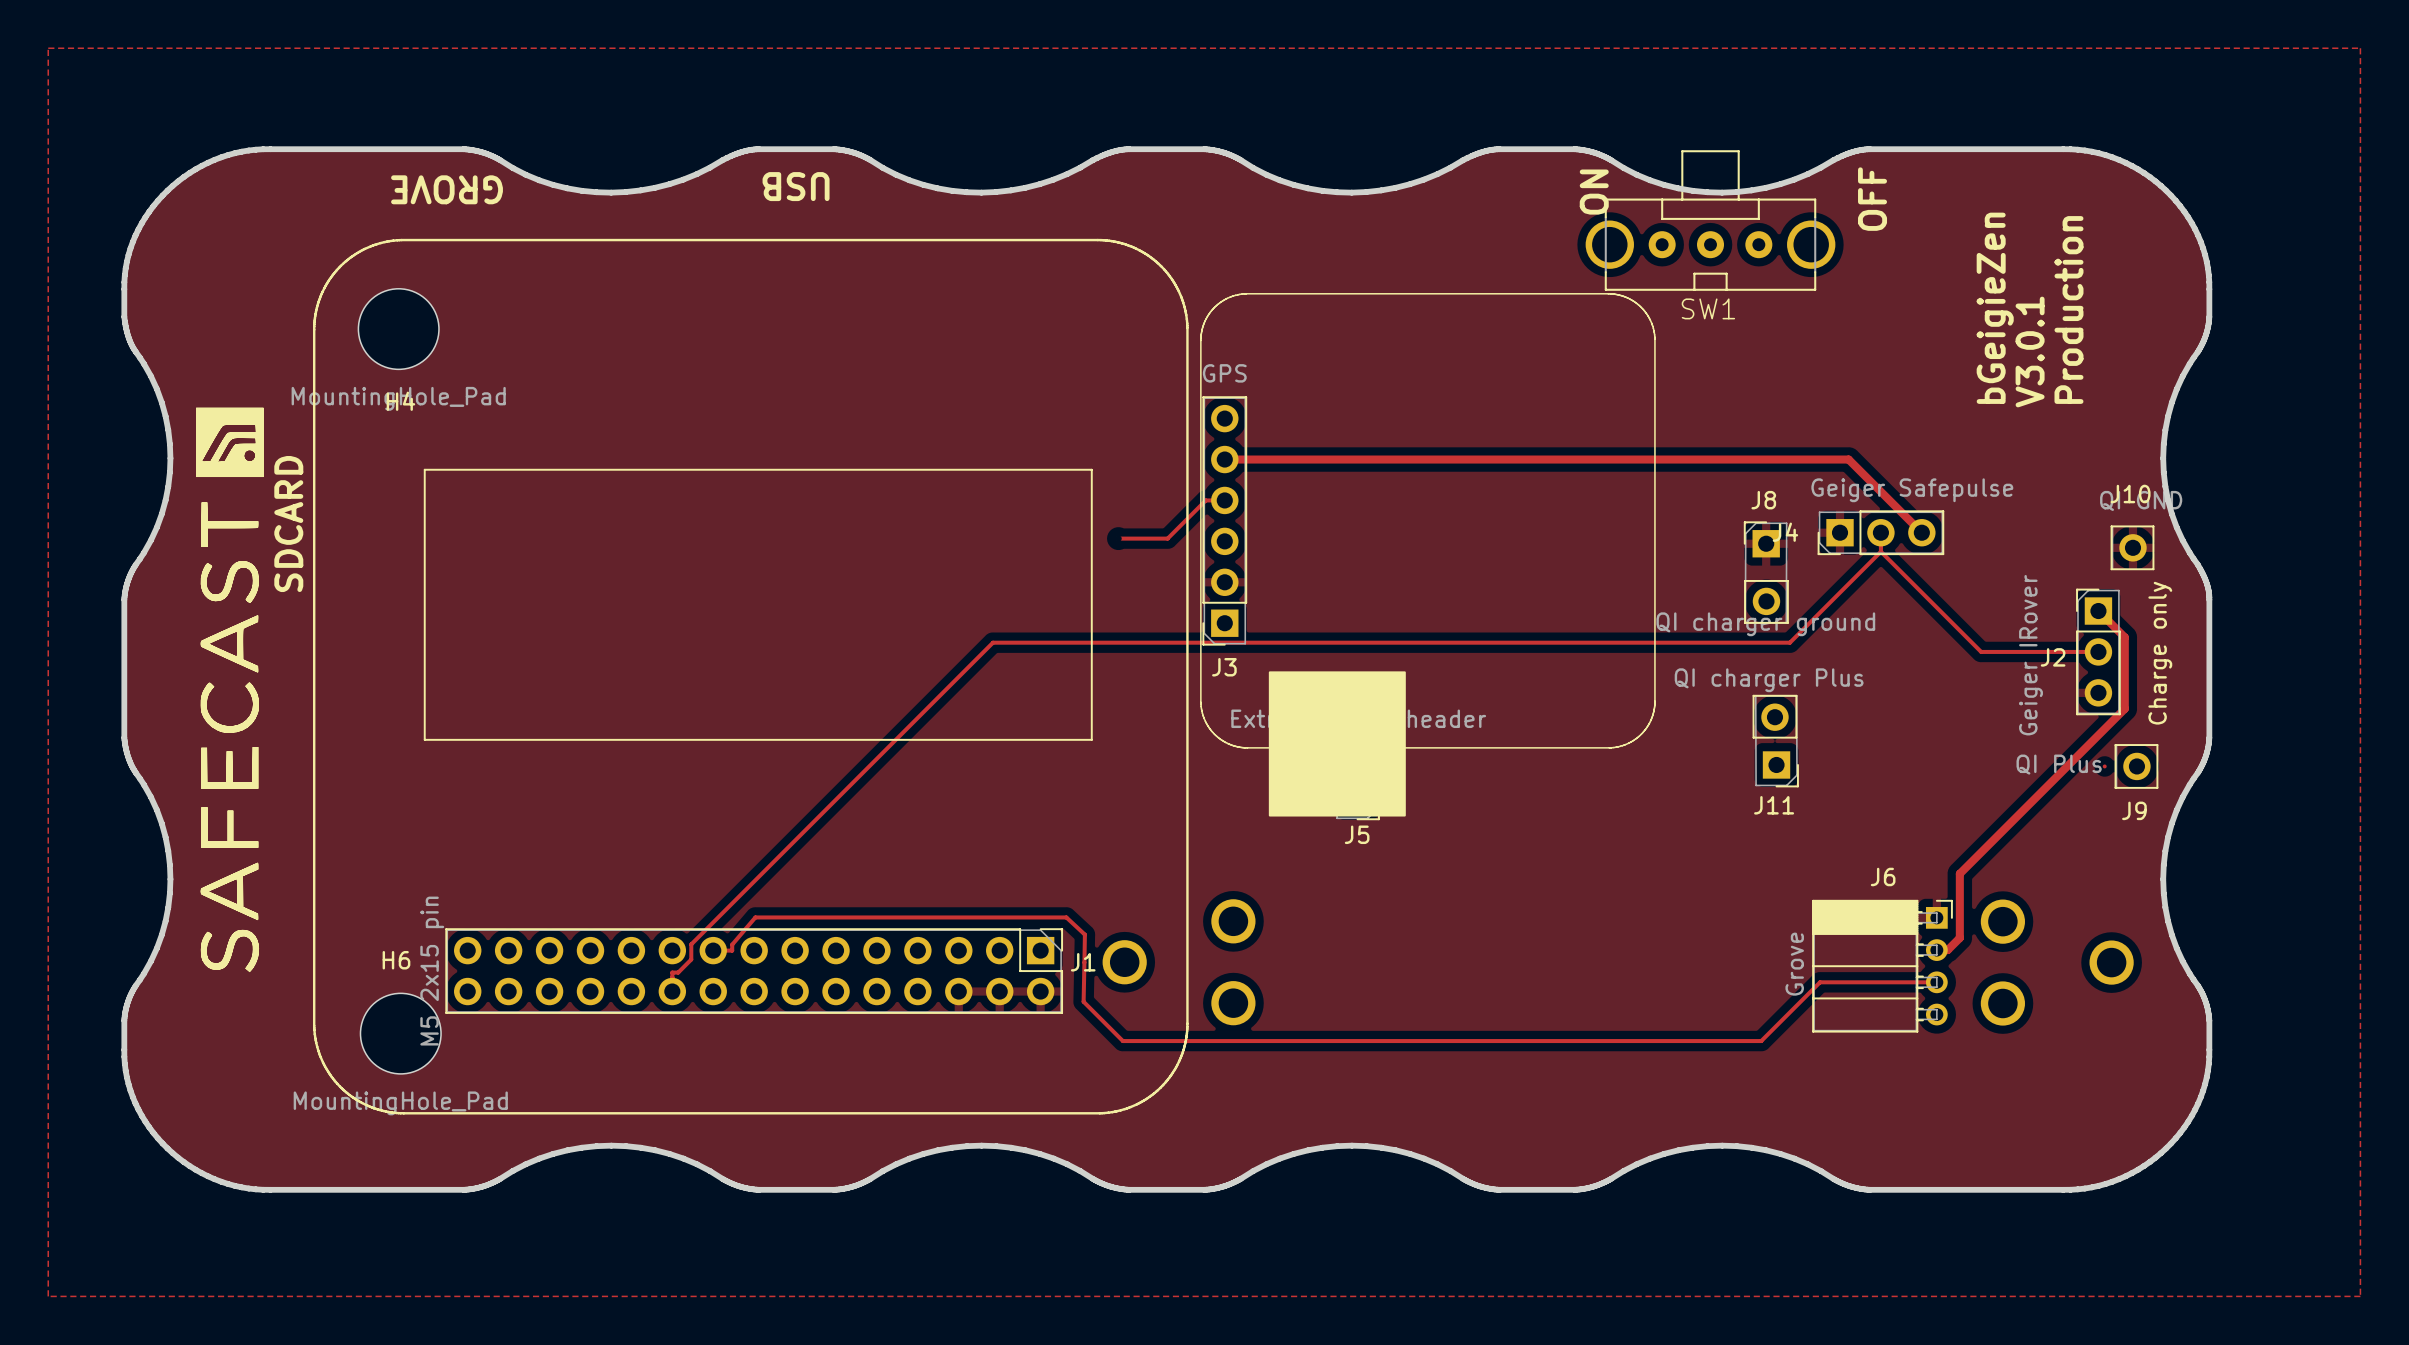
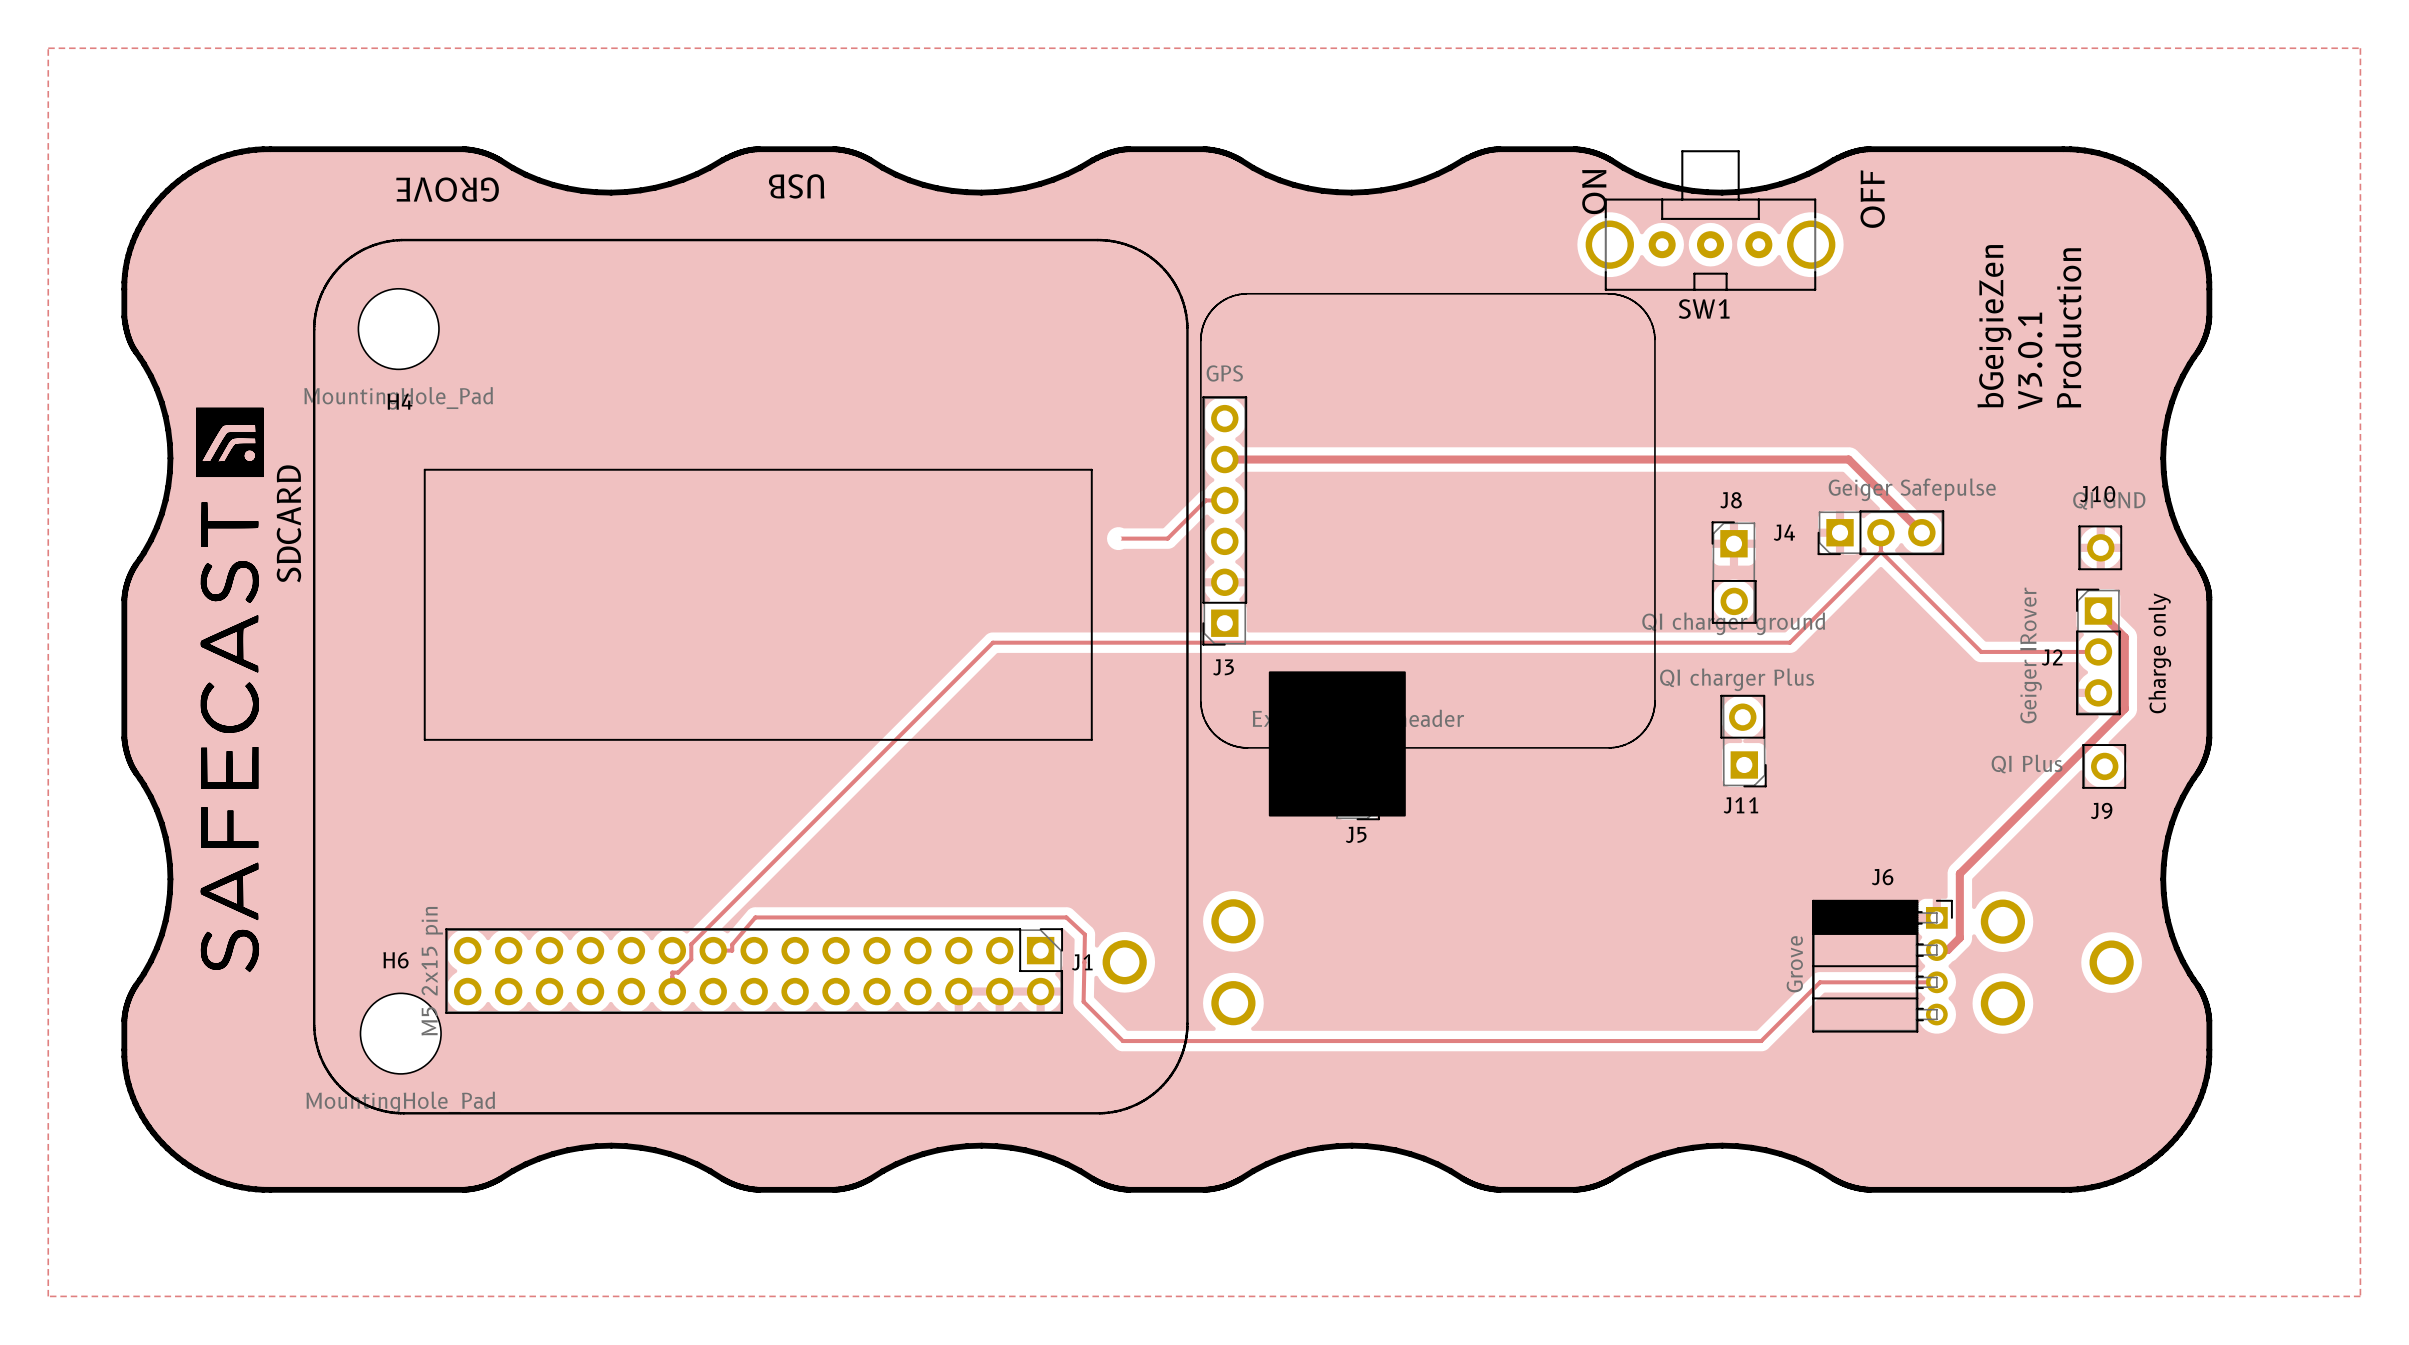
J10 position: (2132, 547) -> (2100, 547)
J8 position: (1766, 572) -> (1734, 572)
J11 position: (1775, 741) -> (1743, 741)
J9 position: (2136, 766) -> (2104, 766)

